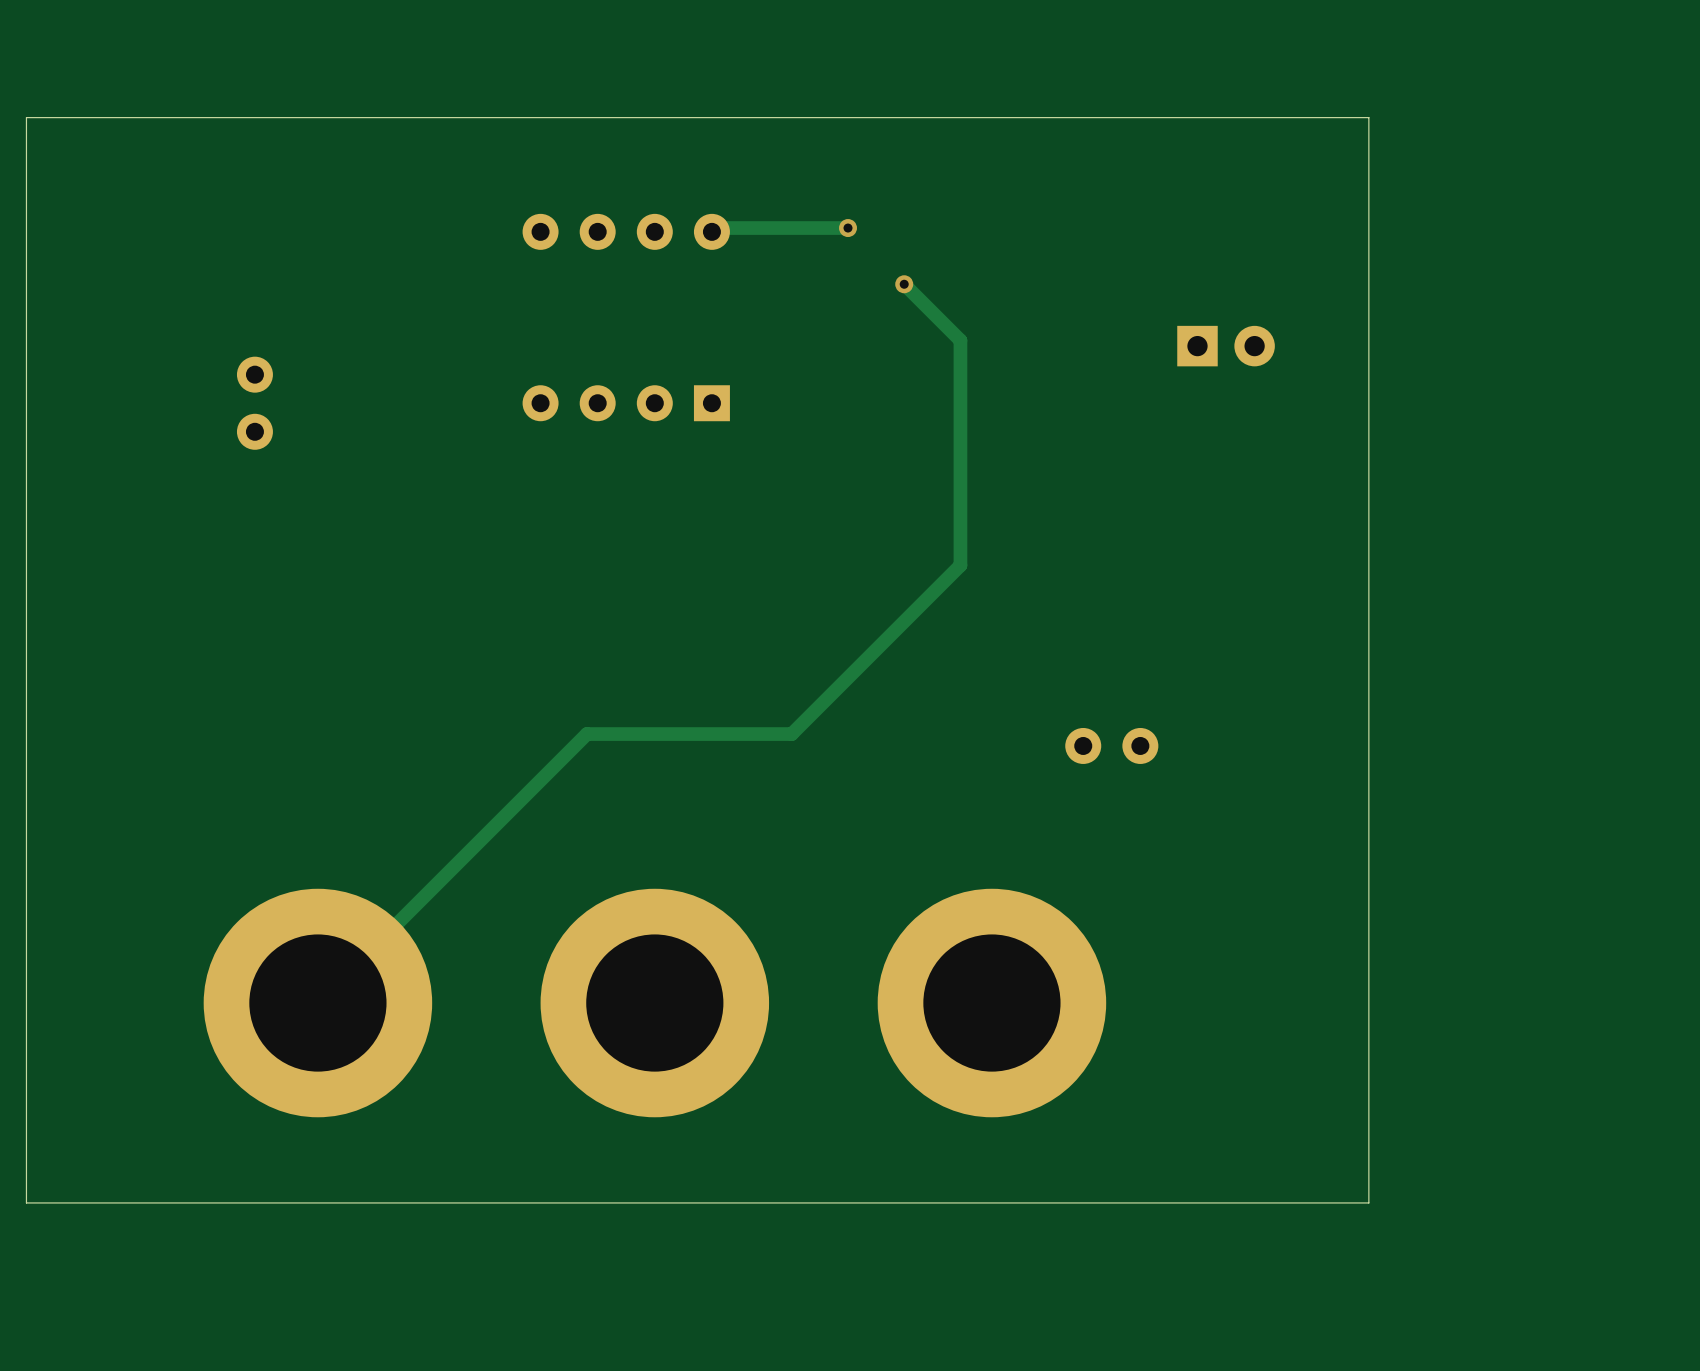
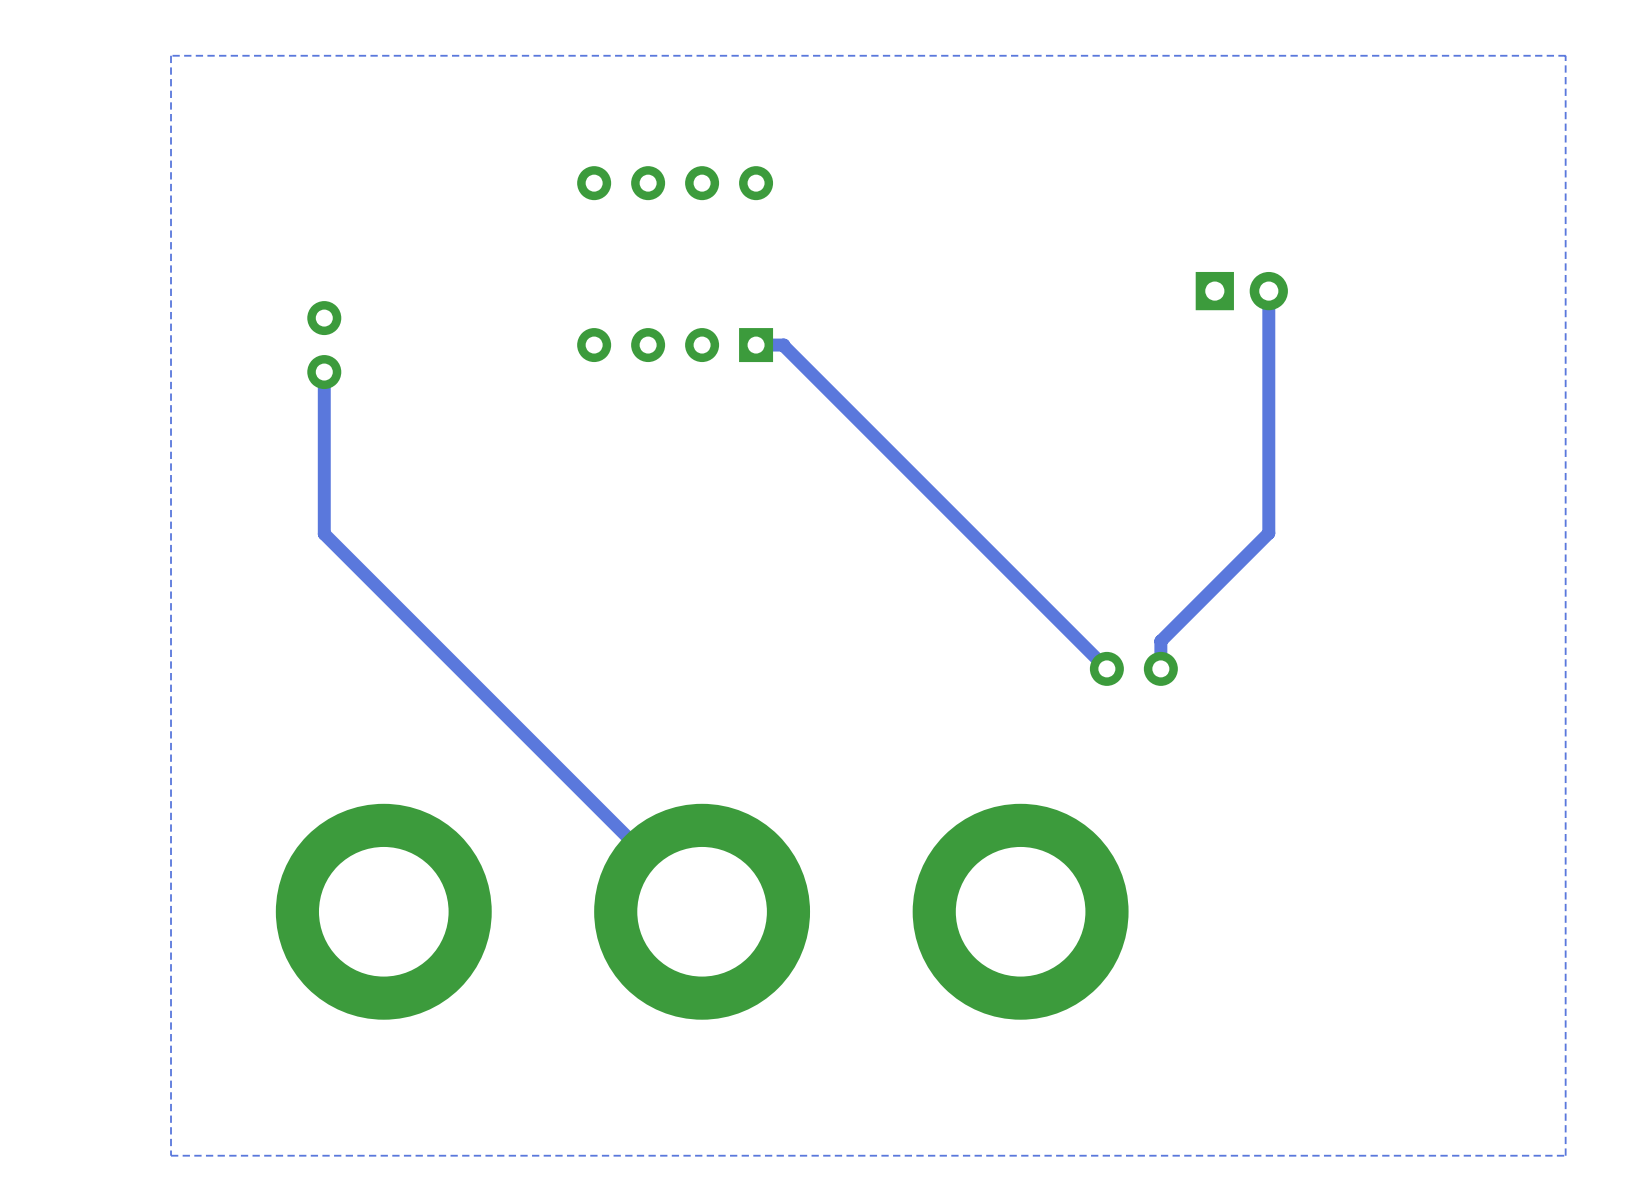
zone outline: none -> (1565, 55) (1565, 1155) (171, 1155) (171, 55) (1565, 55)
board edge: (1368, 117) (26, 117) (26, 1202) (1368, 1202) (1368, 117) -> none
track: (848, 228) (715, 228) (711, 231) -> none
via: (848, 228) -> none
track: (904, 284) (960, 340) (960, 565) (791, 734) (586, 734) (317, 1003) -> none
via: (904, 284) -> none
track: none -> (1268, 291) (1268, 533) (1160, 641) (1160, 668)
track: none -> (756, 345) (783, 345) (1106, 668)
track: none -> (324, 372) (324, 533) (702, 911)

